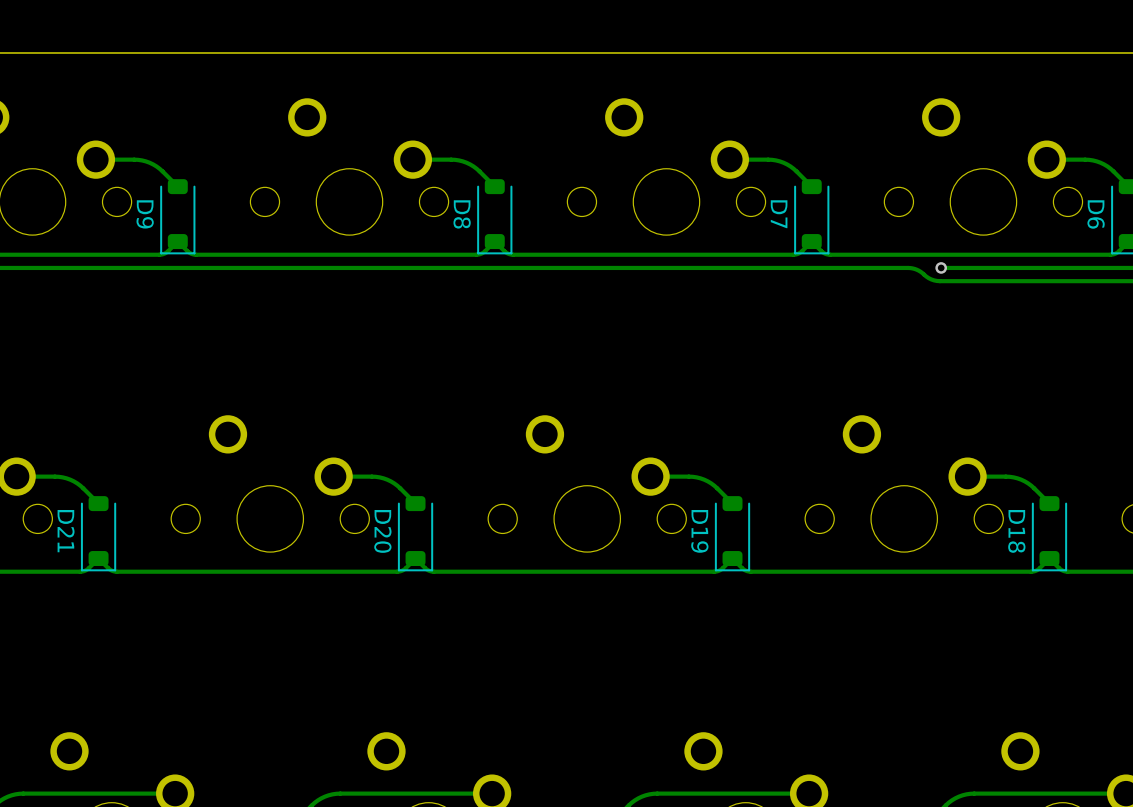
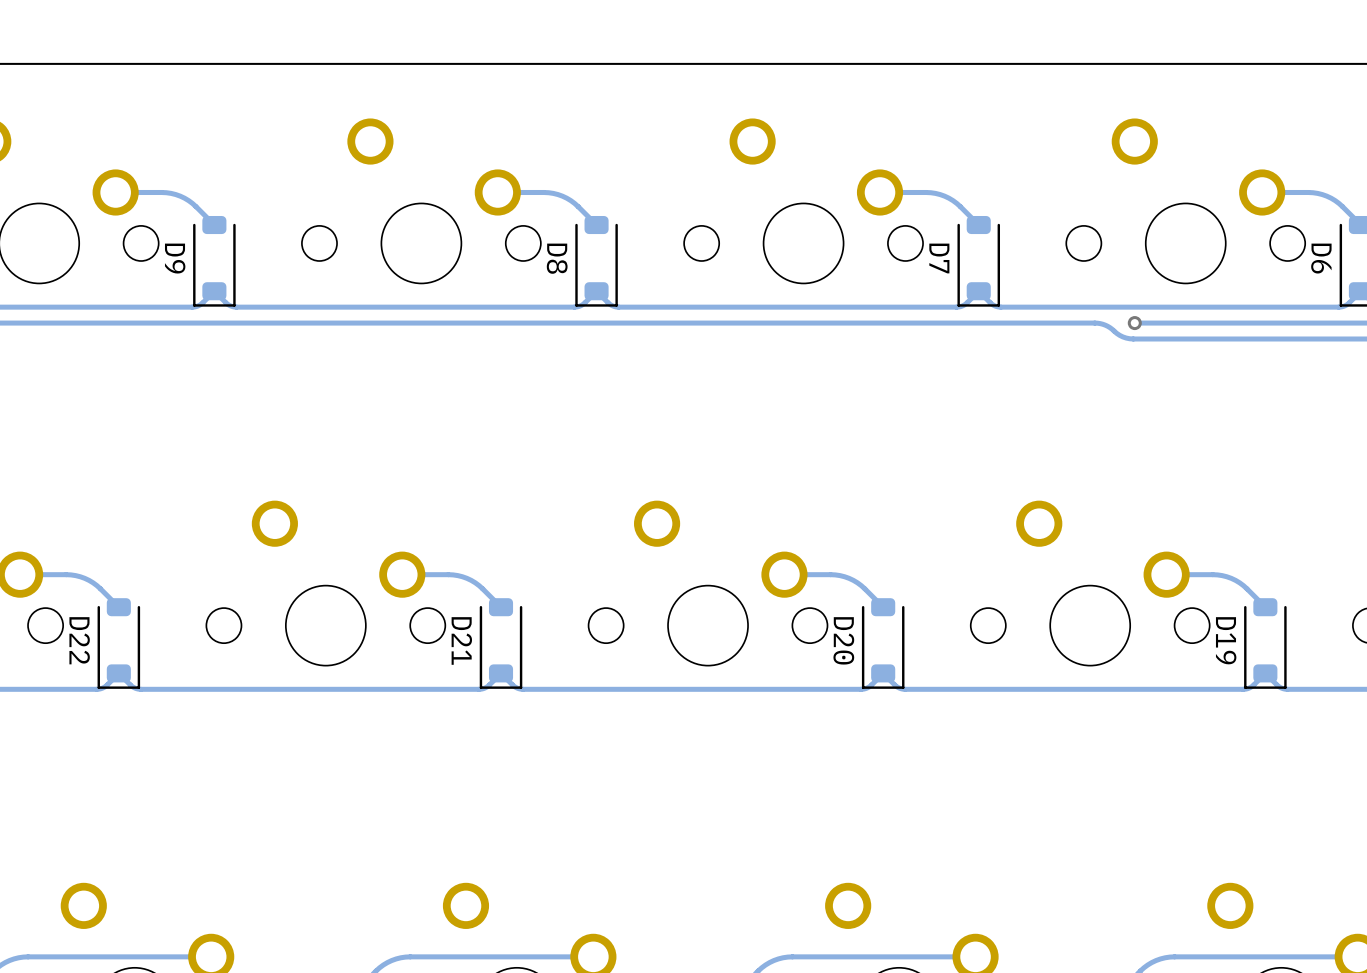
D21 name: D21 (66, 531) -> D22 (79, 640)
D20 name: D20 (382, 531) -> D21 (461, 640)
D19 name: D19 (699, 531) -> D20 (843, 640)
D18 name: D18 (1016, 531) -> D19 (1226, 640)

